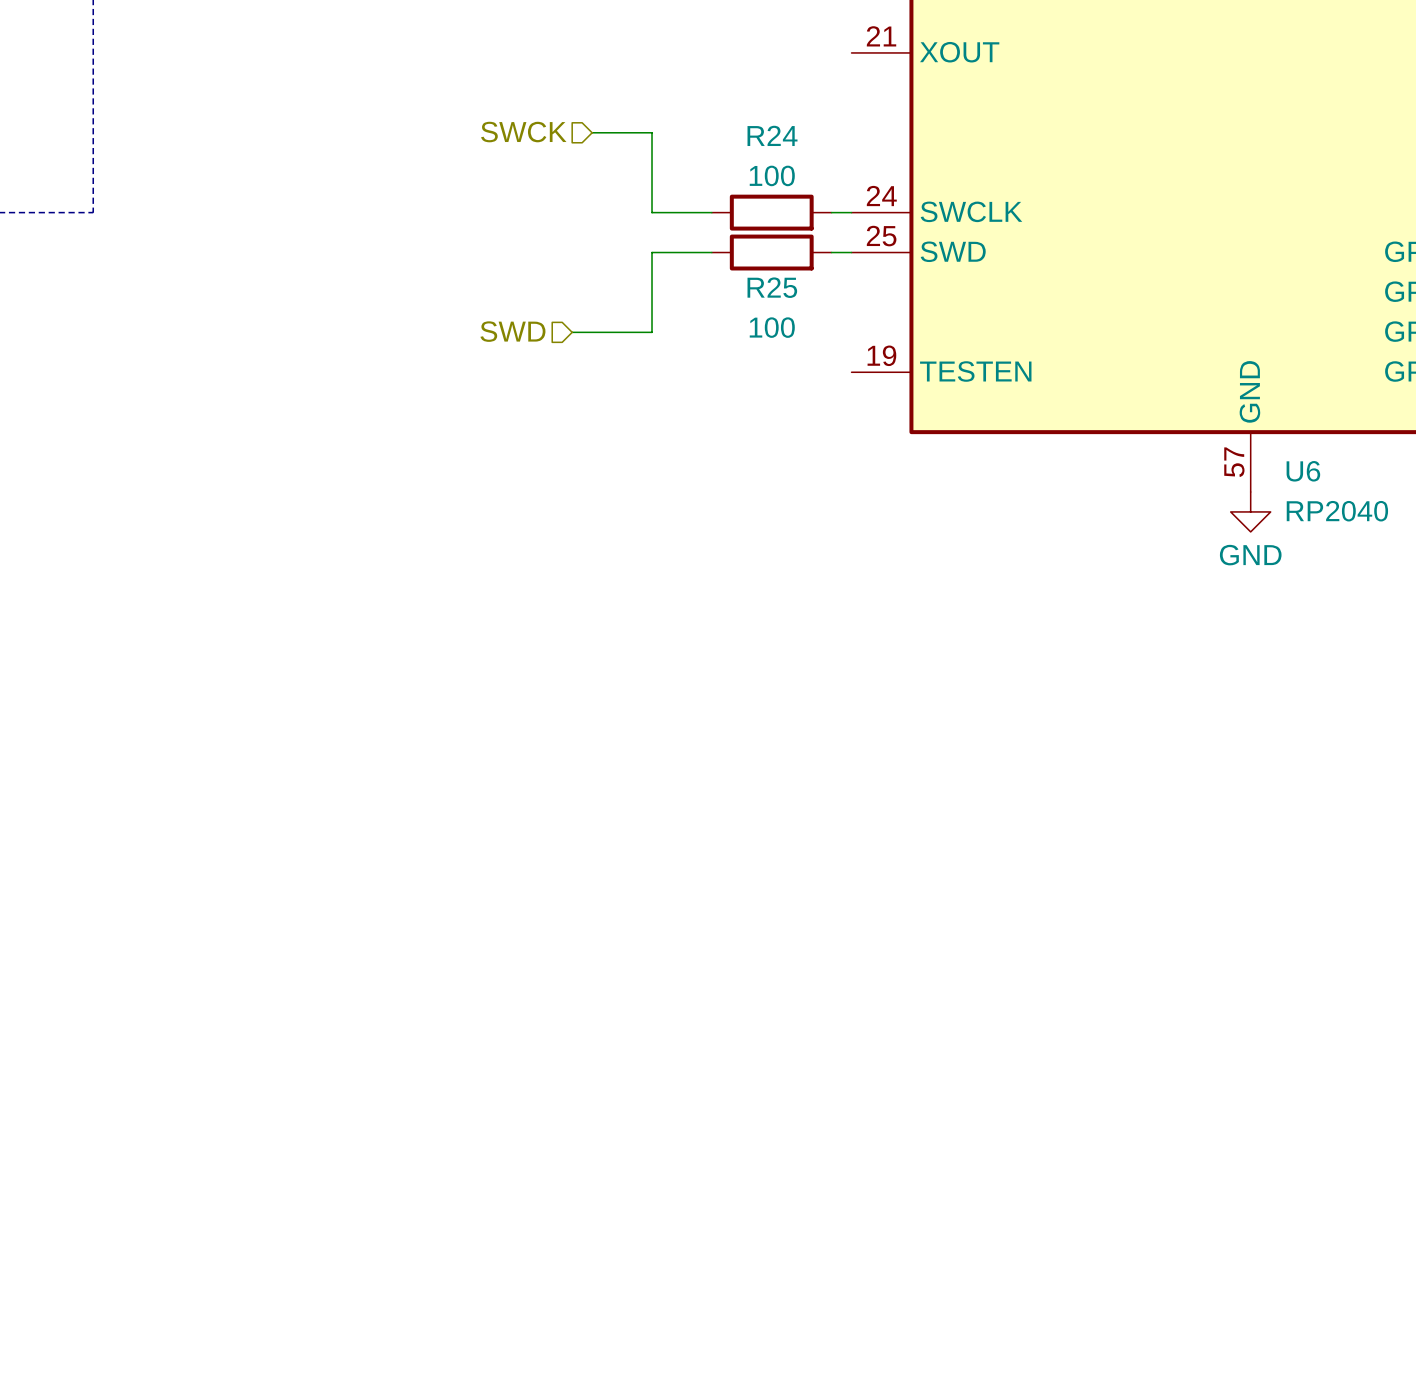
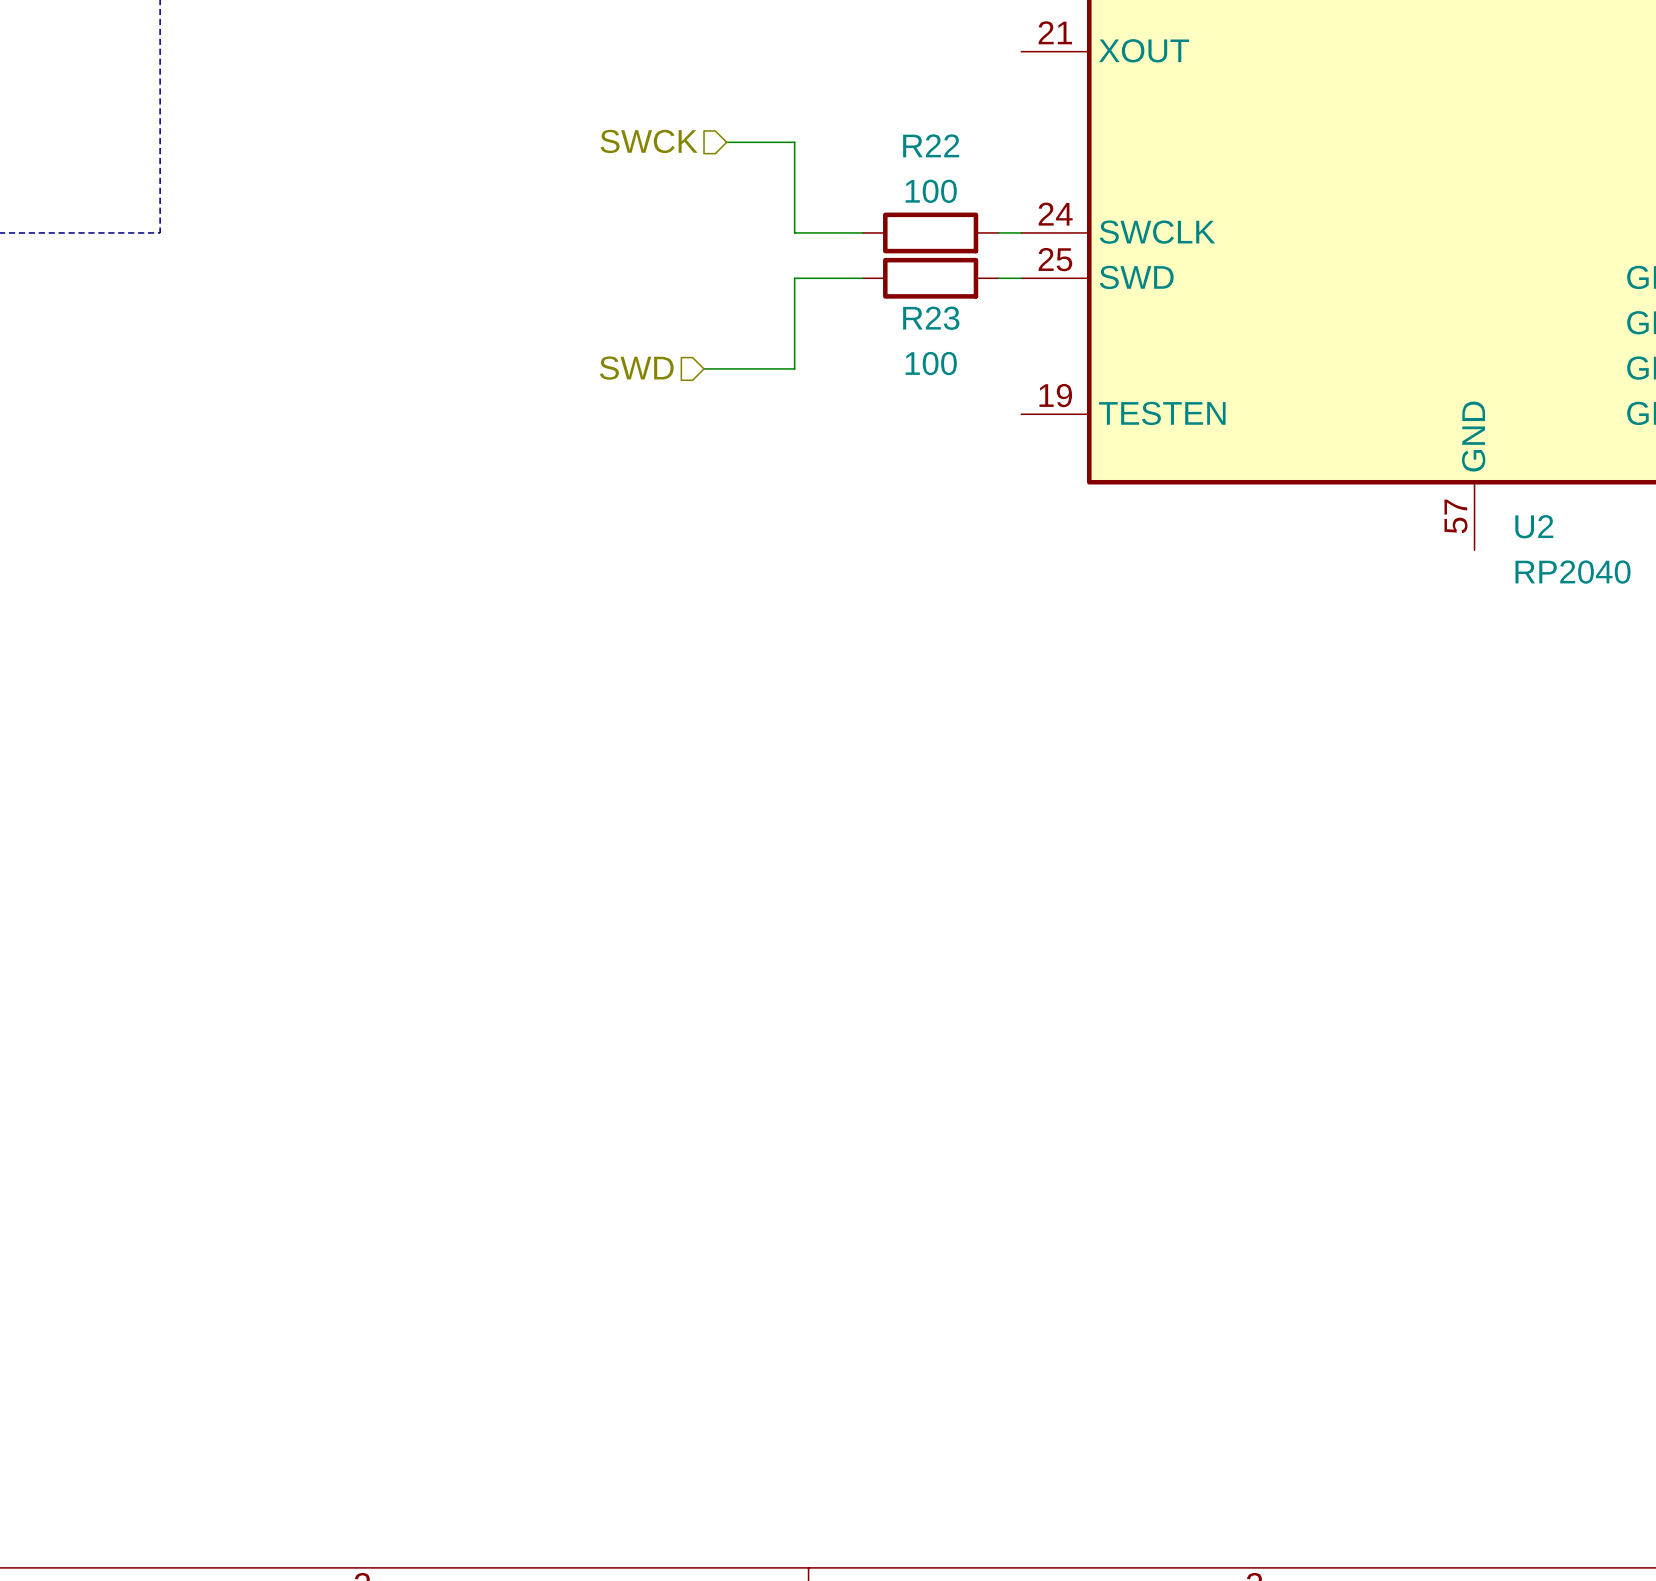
R24 name: R24 (772, 135) -> R22 (931, 145)
R25 name: R25 (772, 287) -> R23 (931, 318)
U6 name: U6 (1303, 471) -> U2 (1534, 526)
power symbol: GND (1250, 511) -> none

